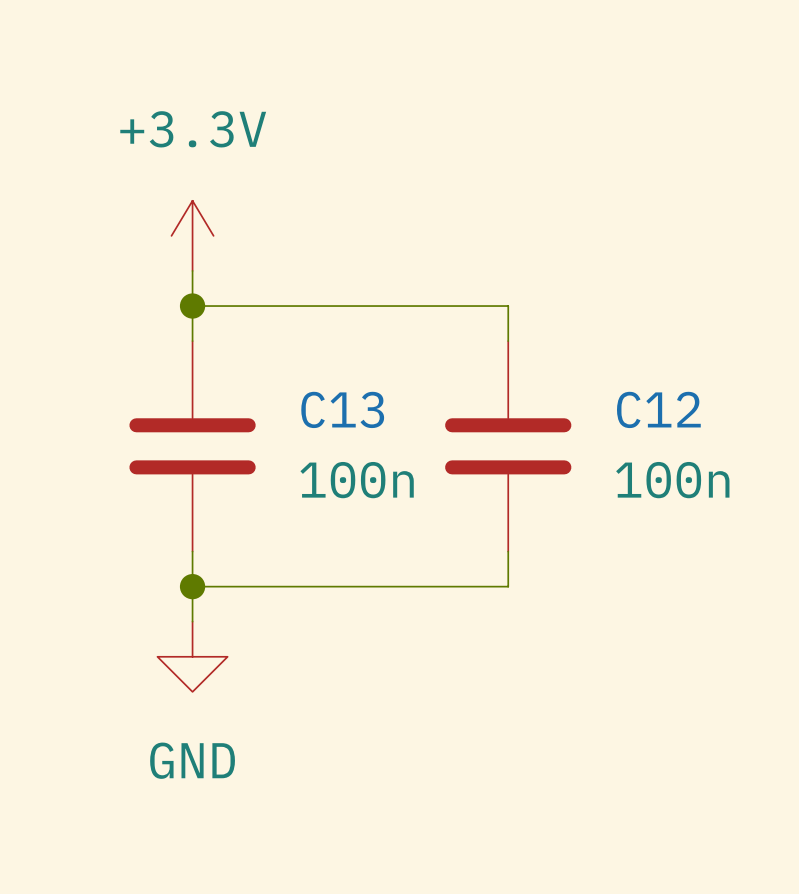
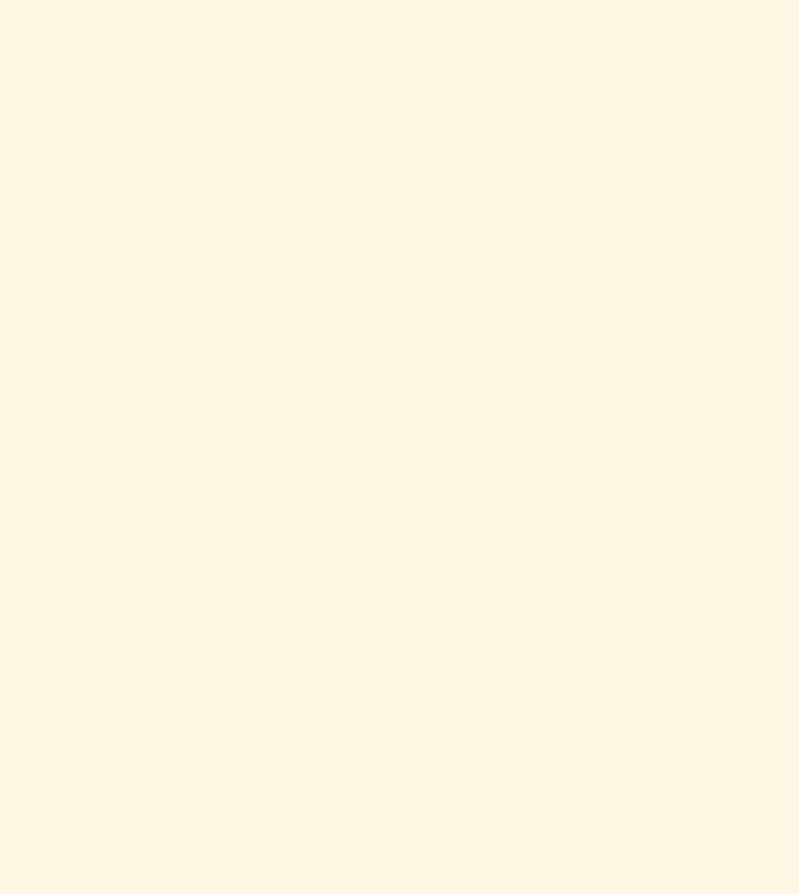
power symbol: +3.3V (192, 235) -> none
wire: (192, 270) (192, 341) -> none
wire: (192, 306) (508, 306) (508, 341) -> none
junction: (192, 306) -> none
C13: 100n (192, 446) -> none
C12: 100n (508, 446) -> none
wire: (192, 551) (192, 621) -> none
wire: (508, 551) (508, 586) (192, 586) -> none
junction: (192, 586) -> none
power symbol: GND (192, 656) -> none

